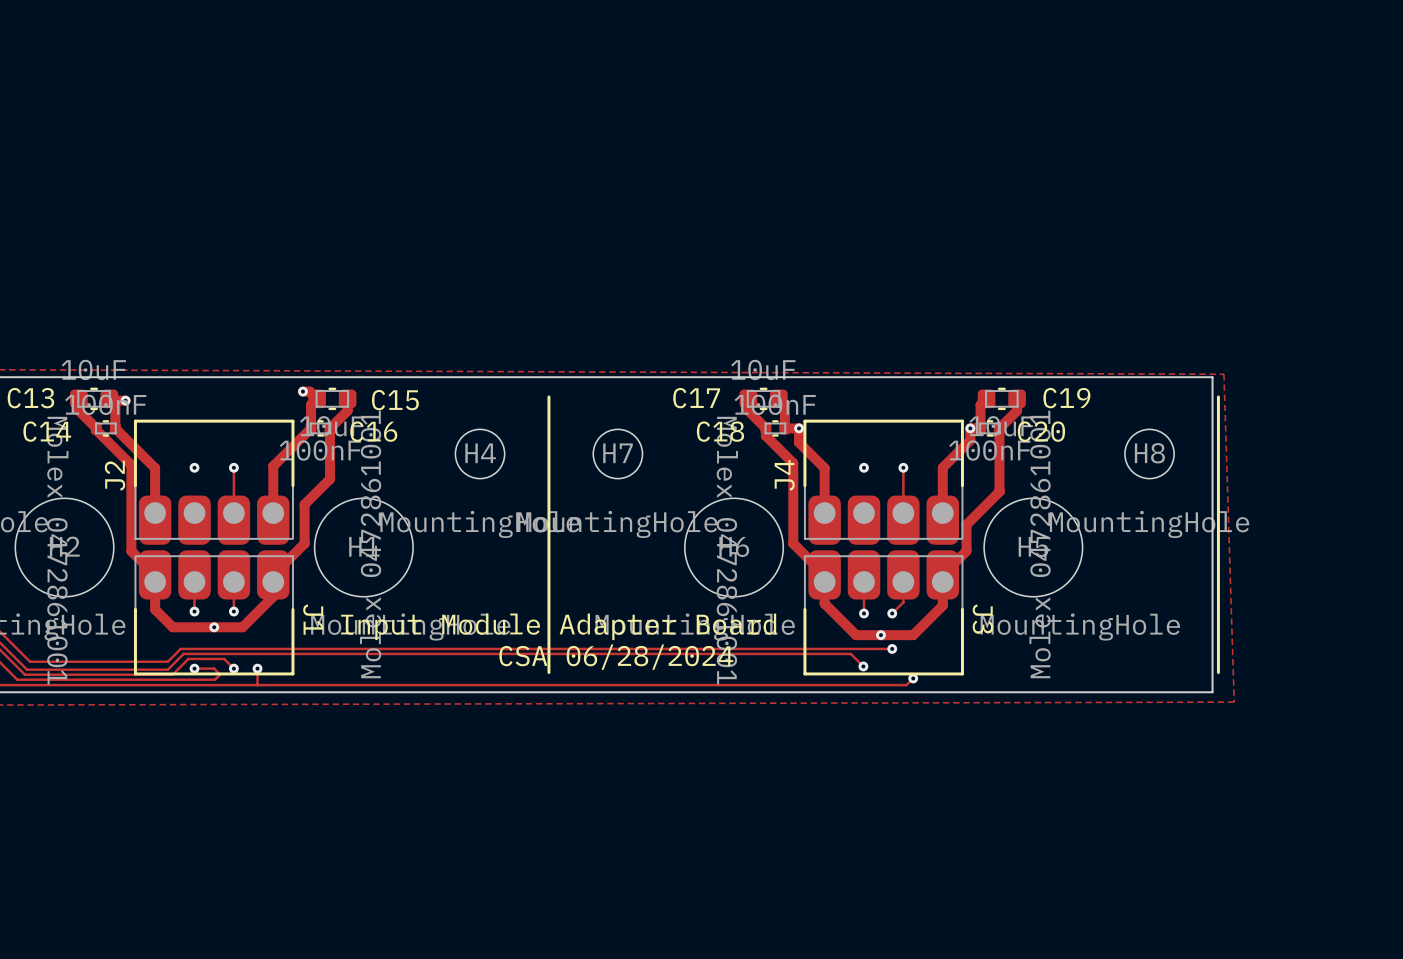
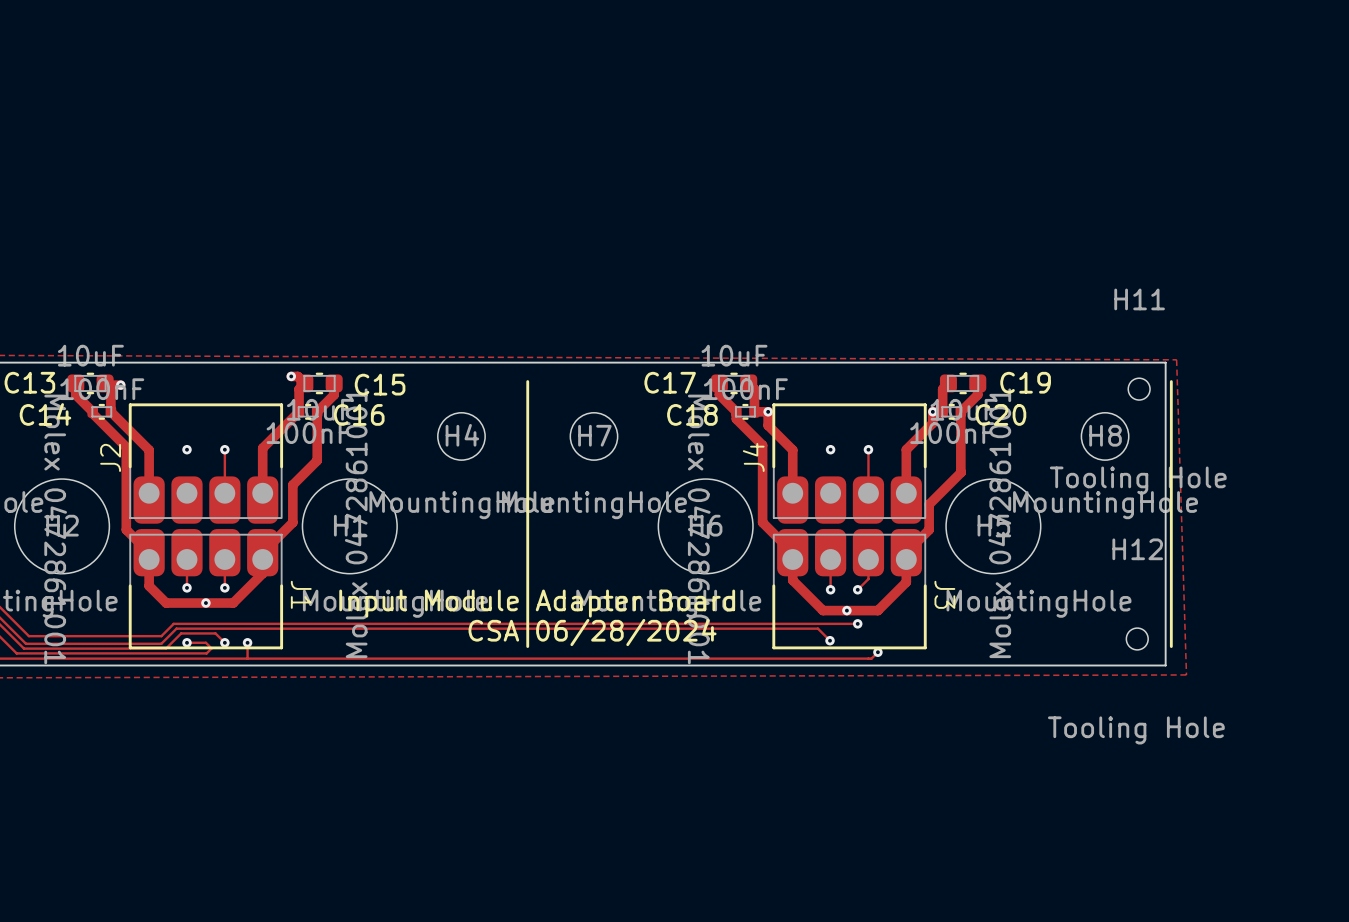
H11: none -> Tooling Hole (1139, 389)
H12: none -> Tooling Hole (1137, 638)

